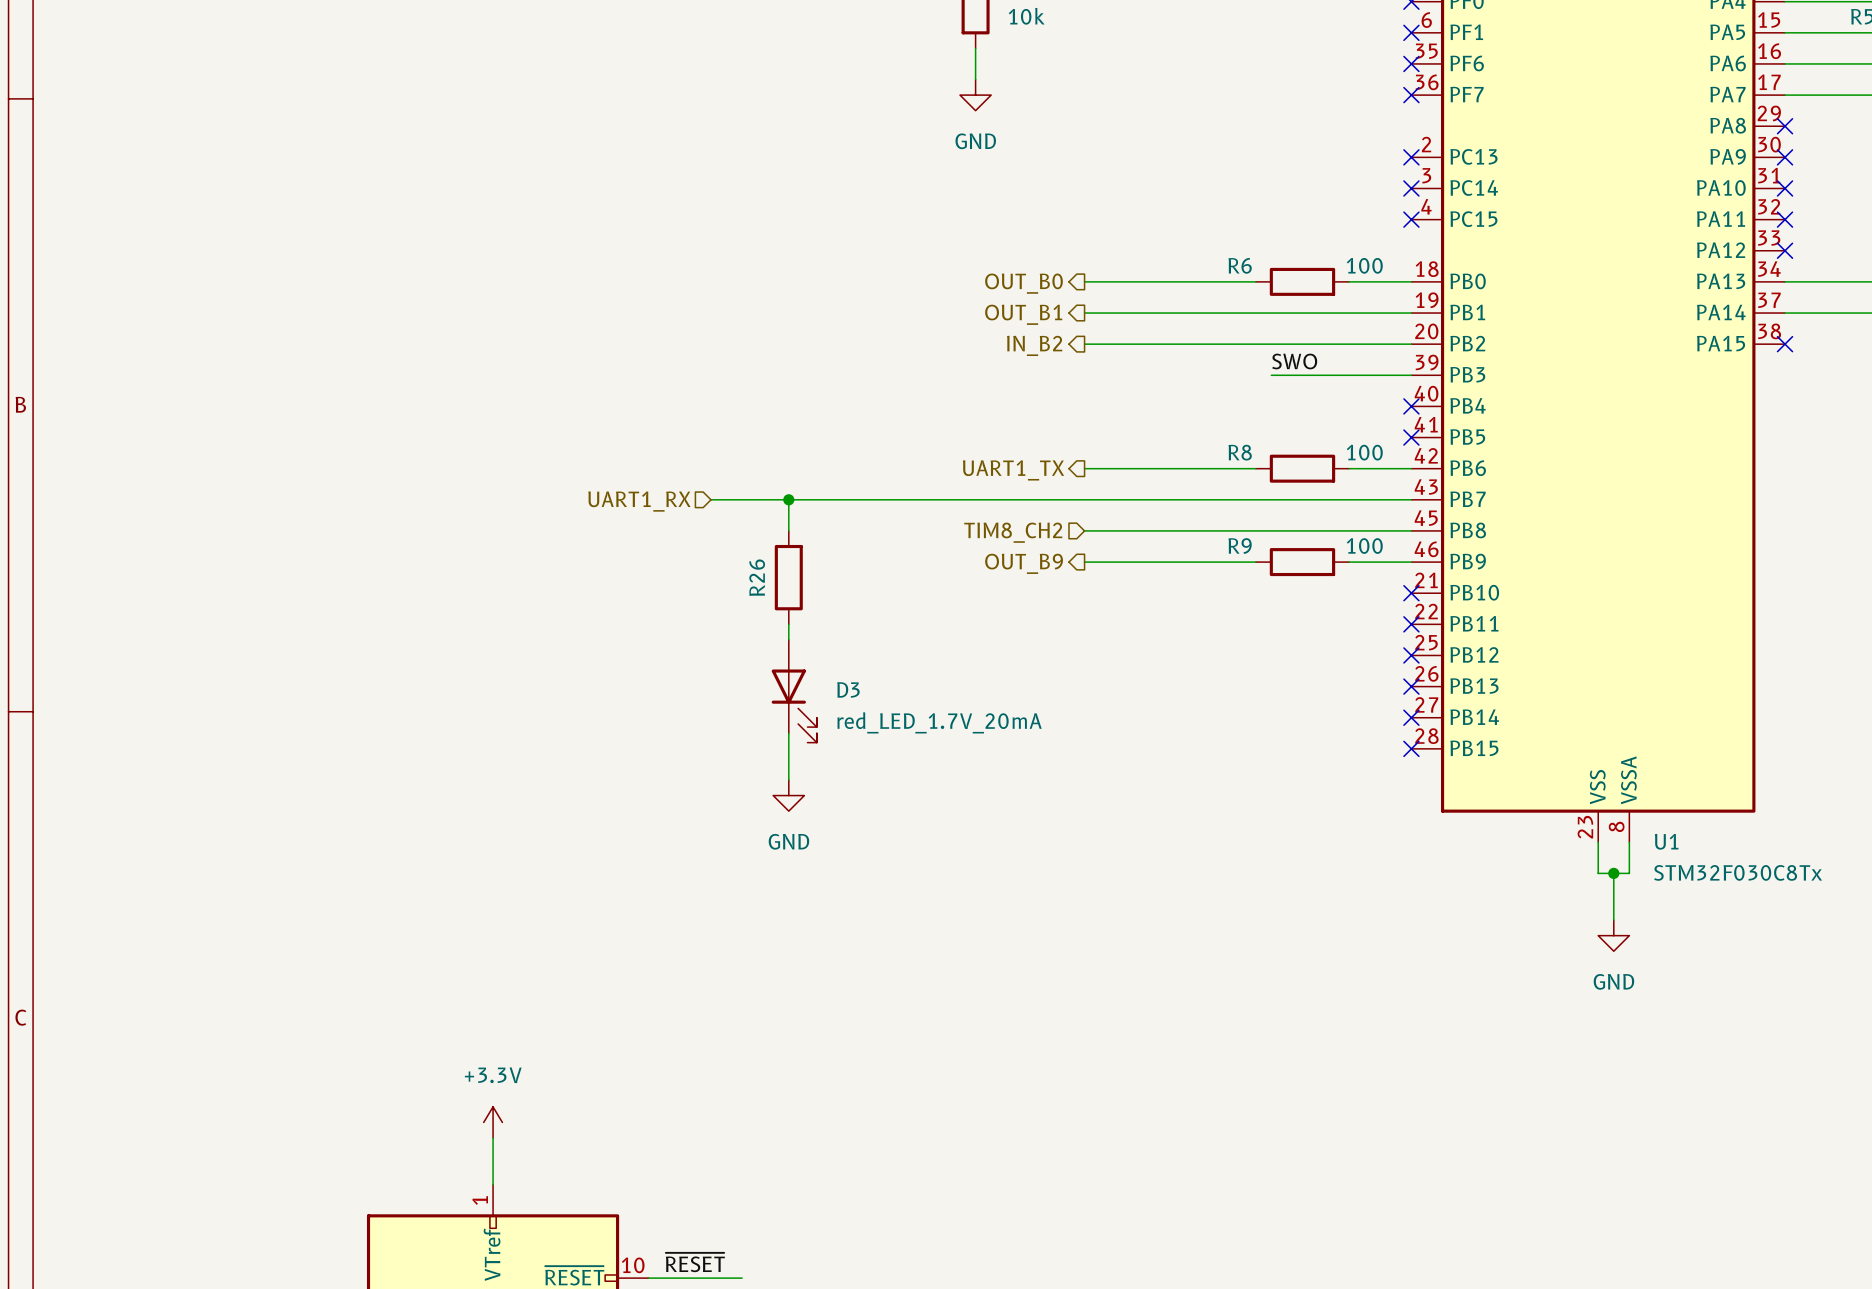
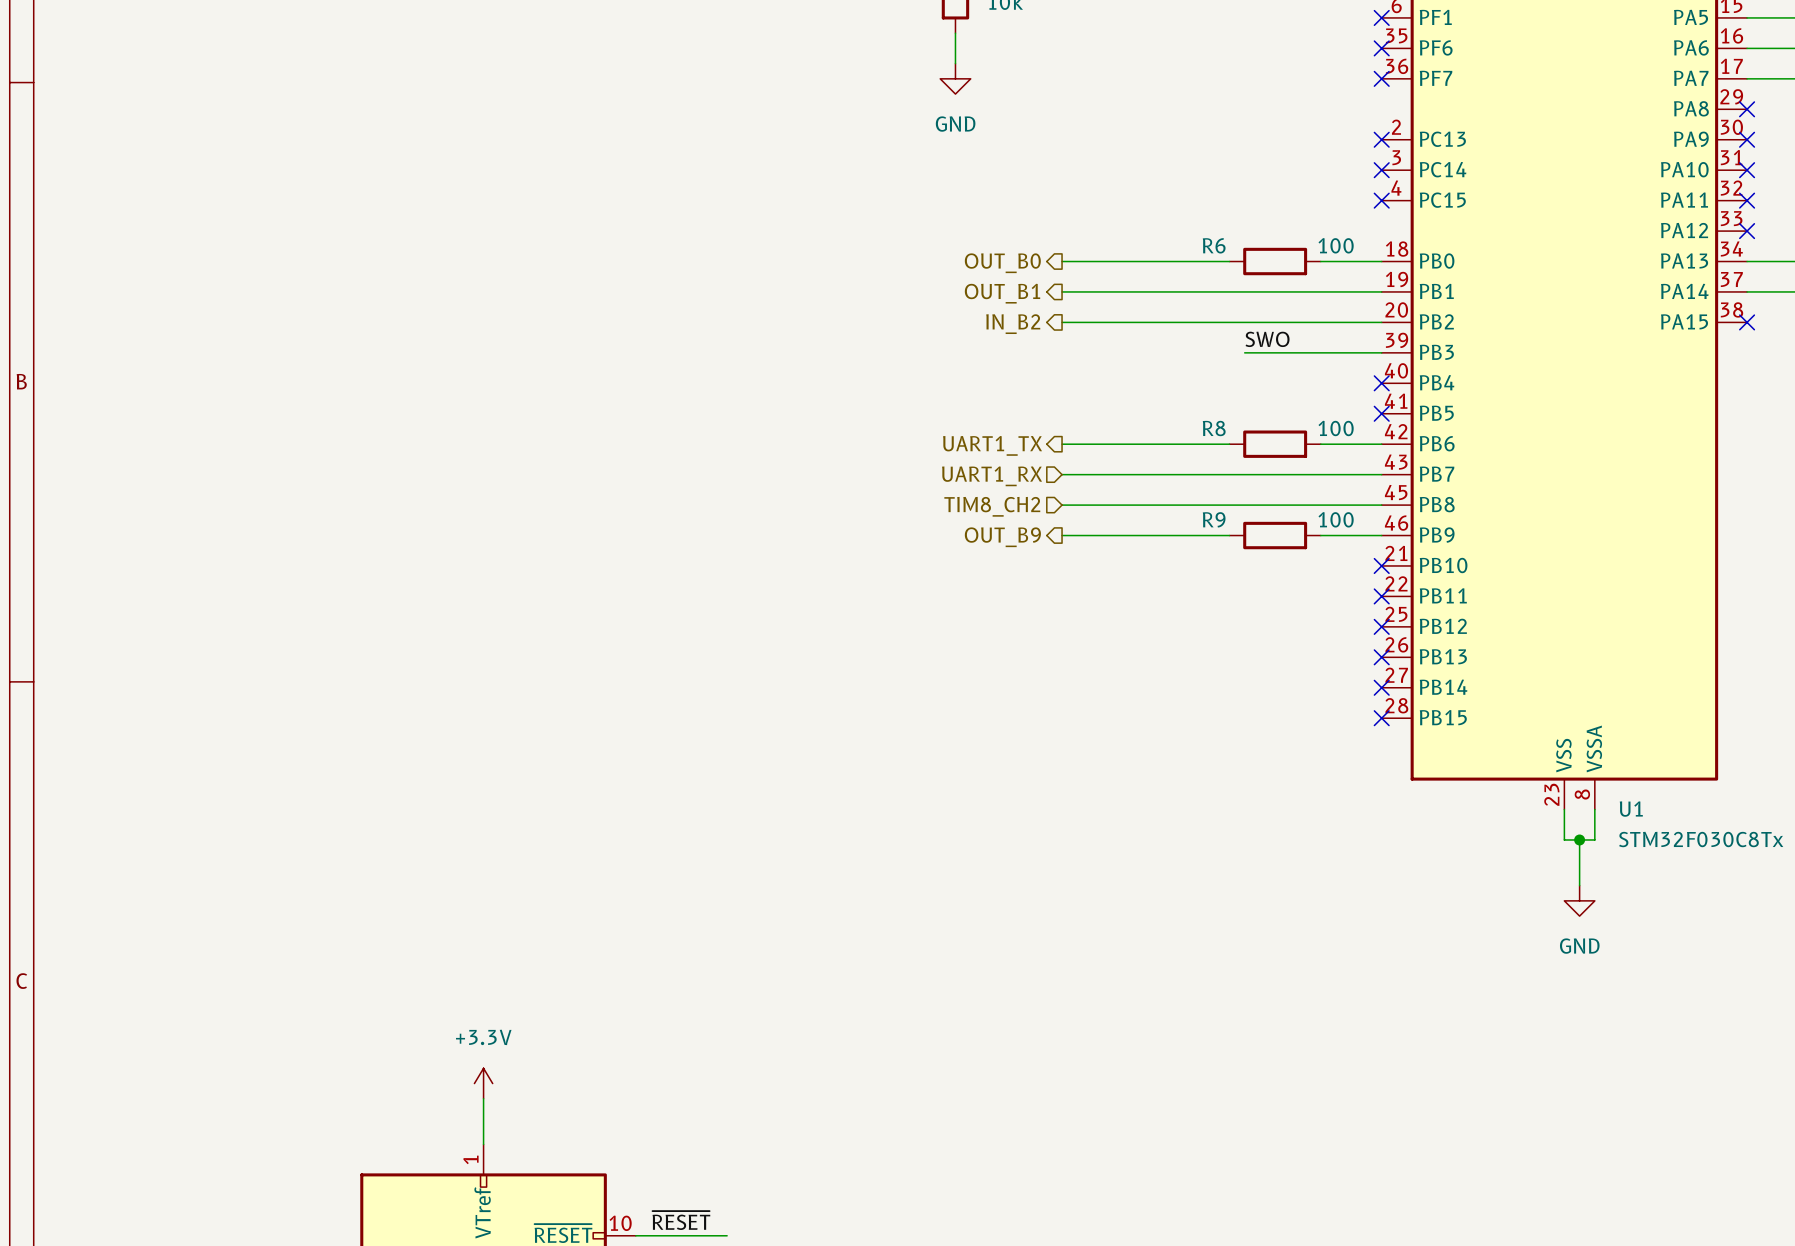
wire: (710, 499) (1084, 499) -> none
wire: (788, 499) (788, 530) -> none
junction: (788, 499) -> none
hierarchical label: UART1_RX (639, 501) -> none
hierarchical label: none -> UART1_RX (992, 476)
R26: (788, 577) -> none
wire: (788, 624) (788, 639) -> none
D3: red_LED_1.7V_20mA (794, 691) -> none
wire: (788, 733) (788, 780) -> none
power symbol: GND (788, 795) -> none

